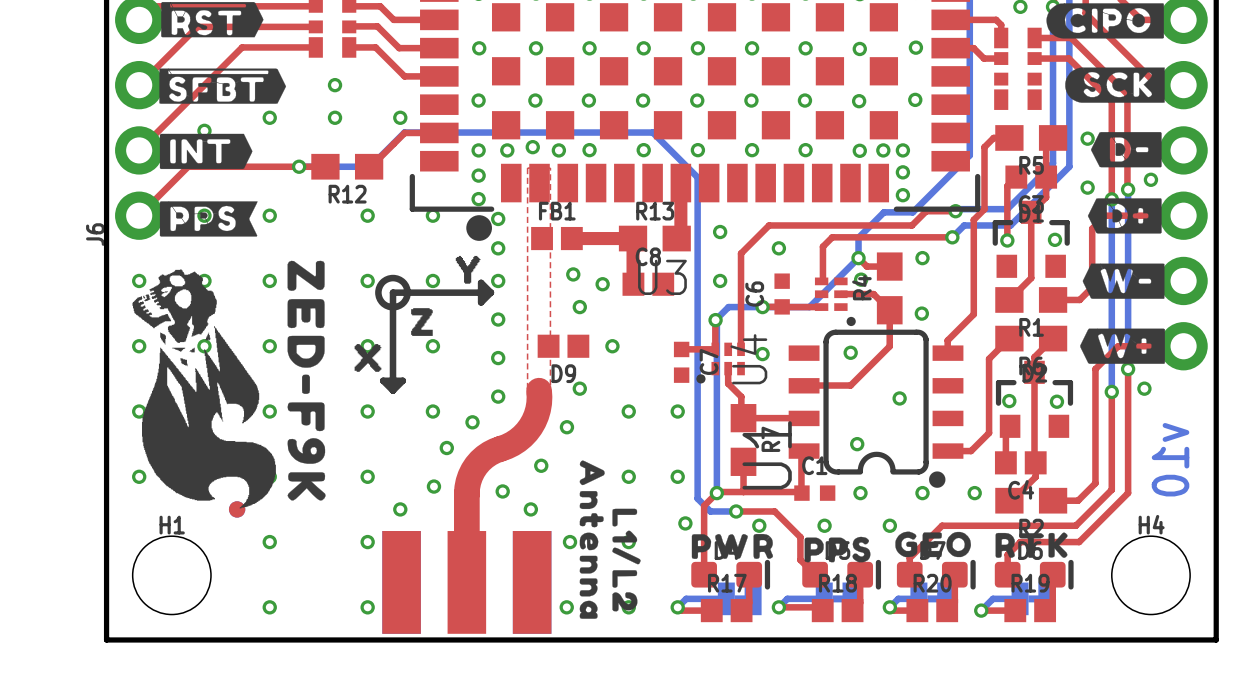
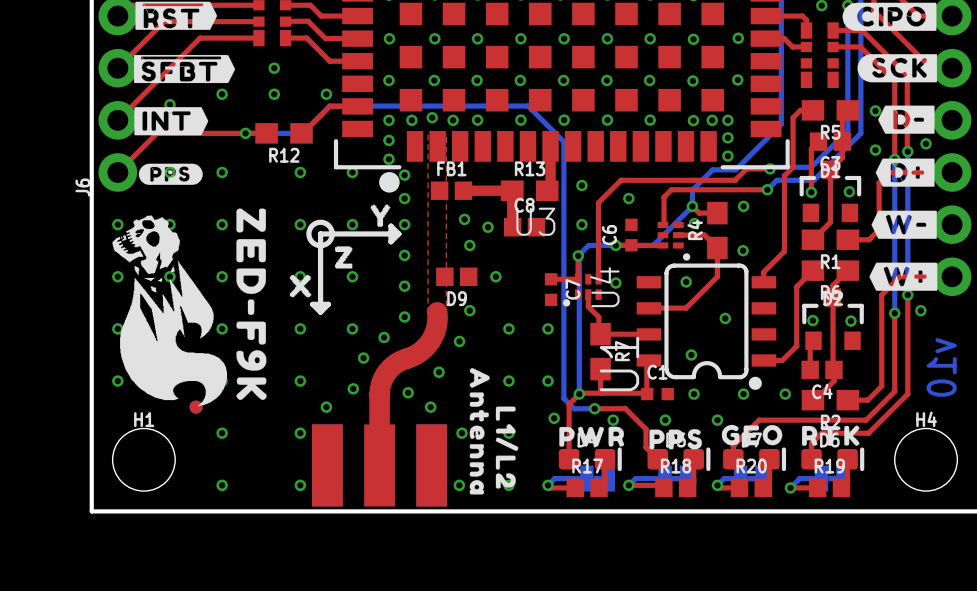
drawing shape: [159, 201, 258, 237] -> [138, 163, 203, 185]

